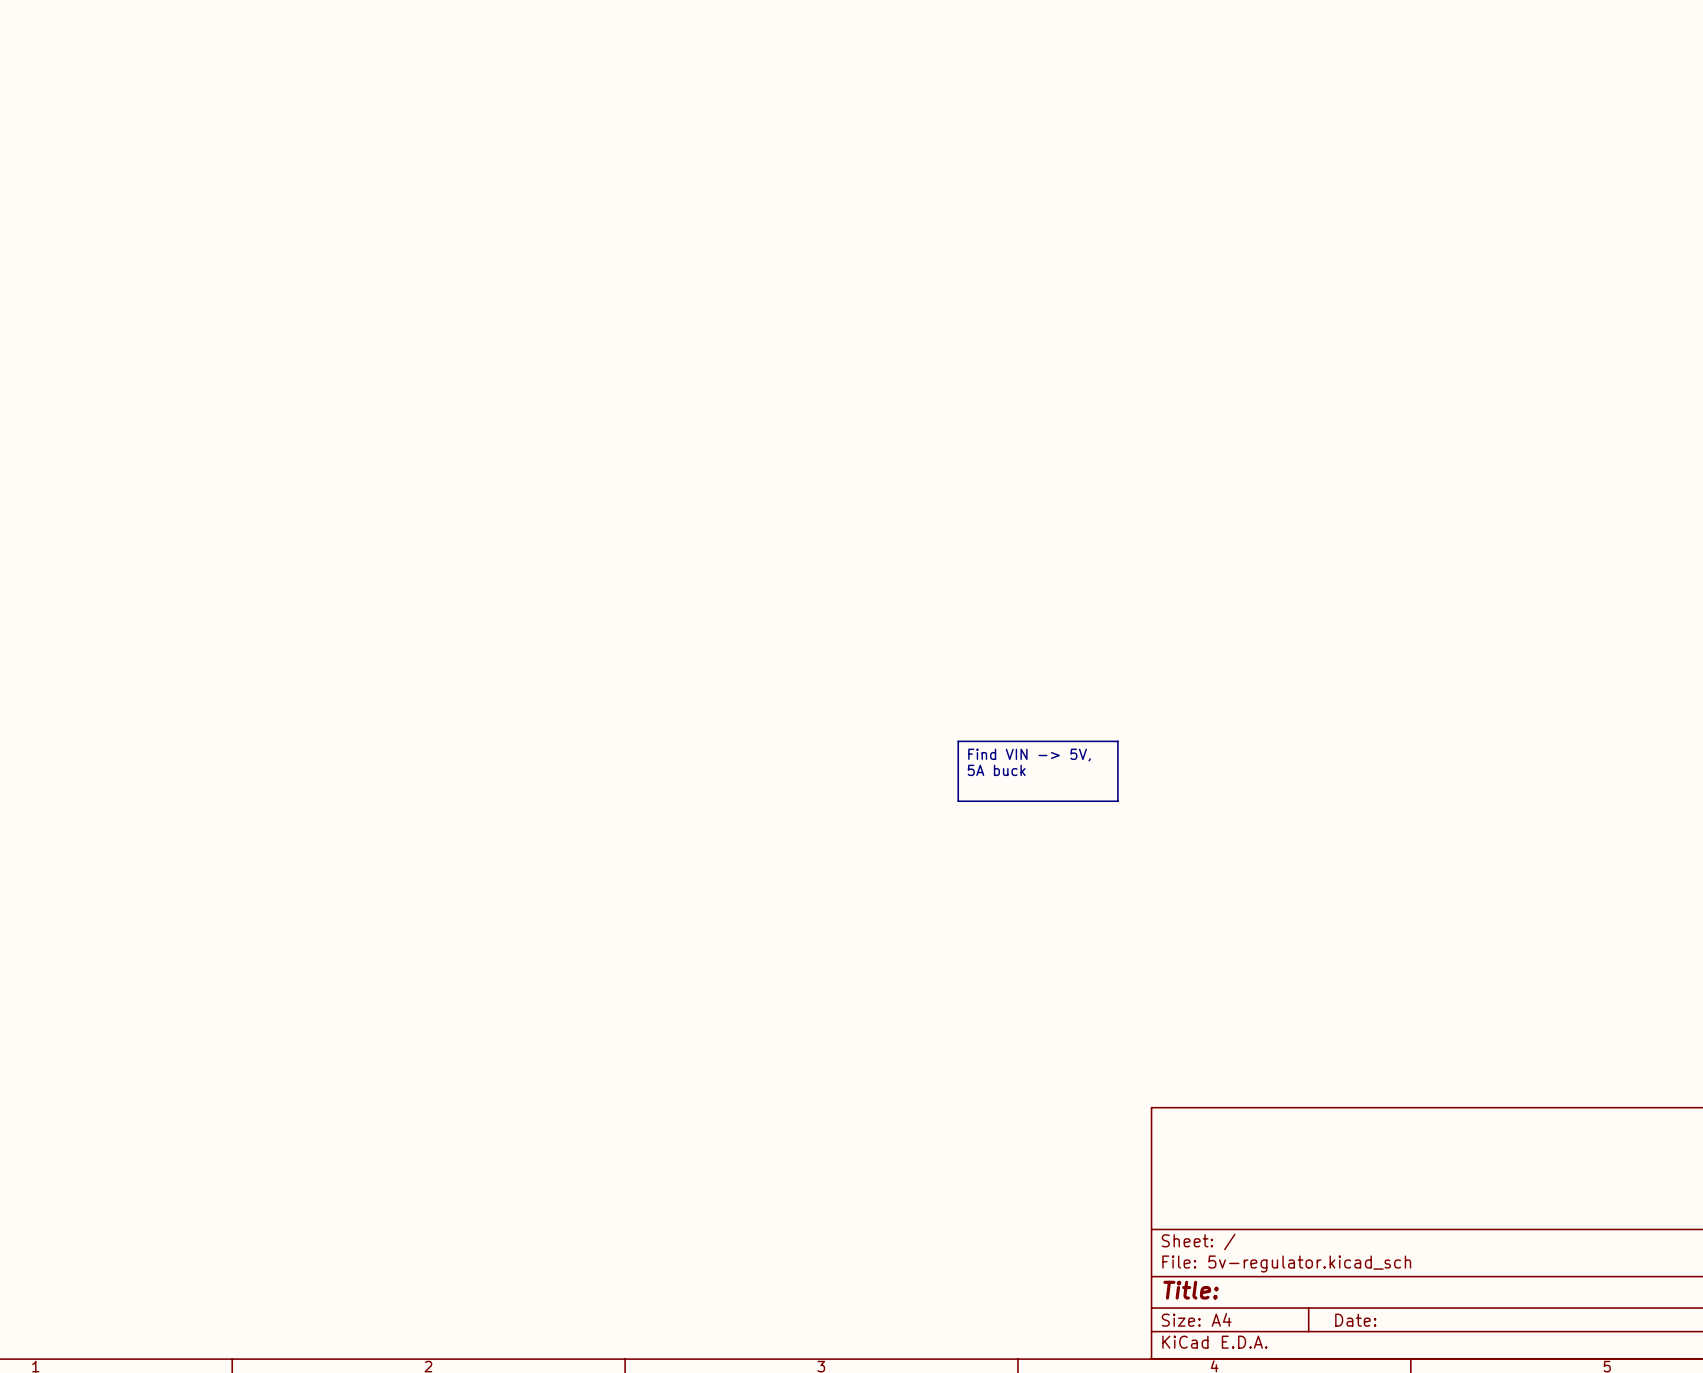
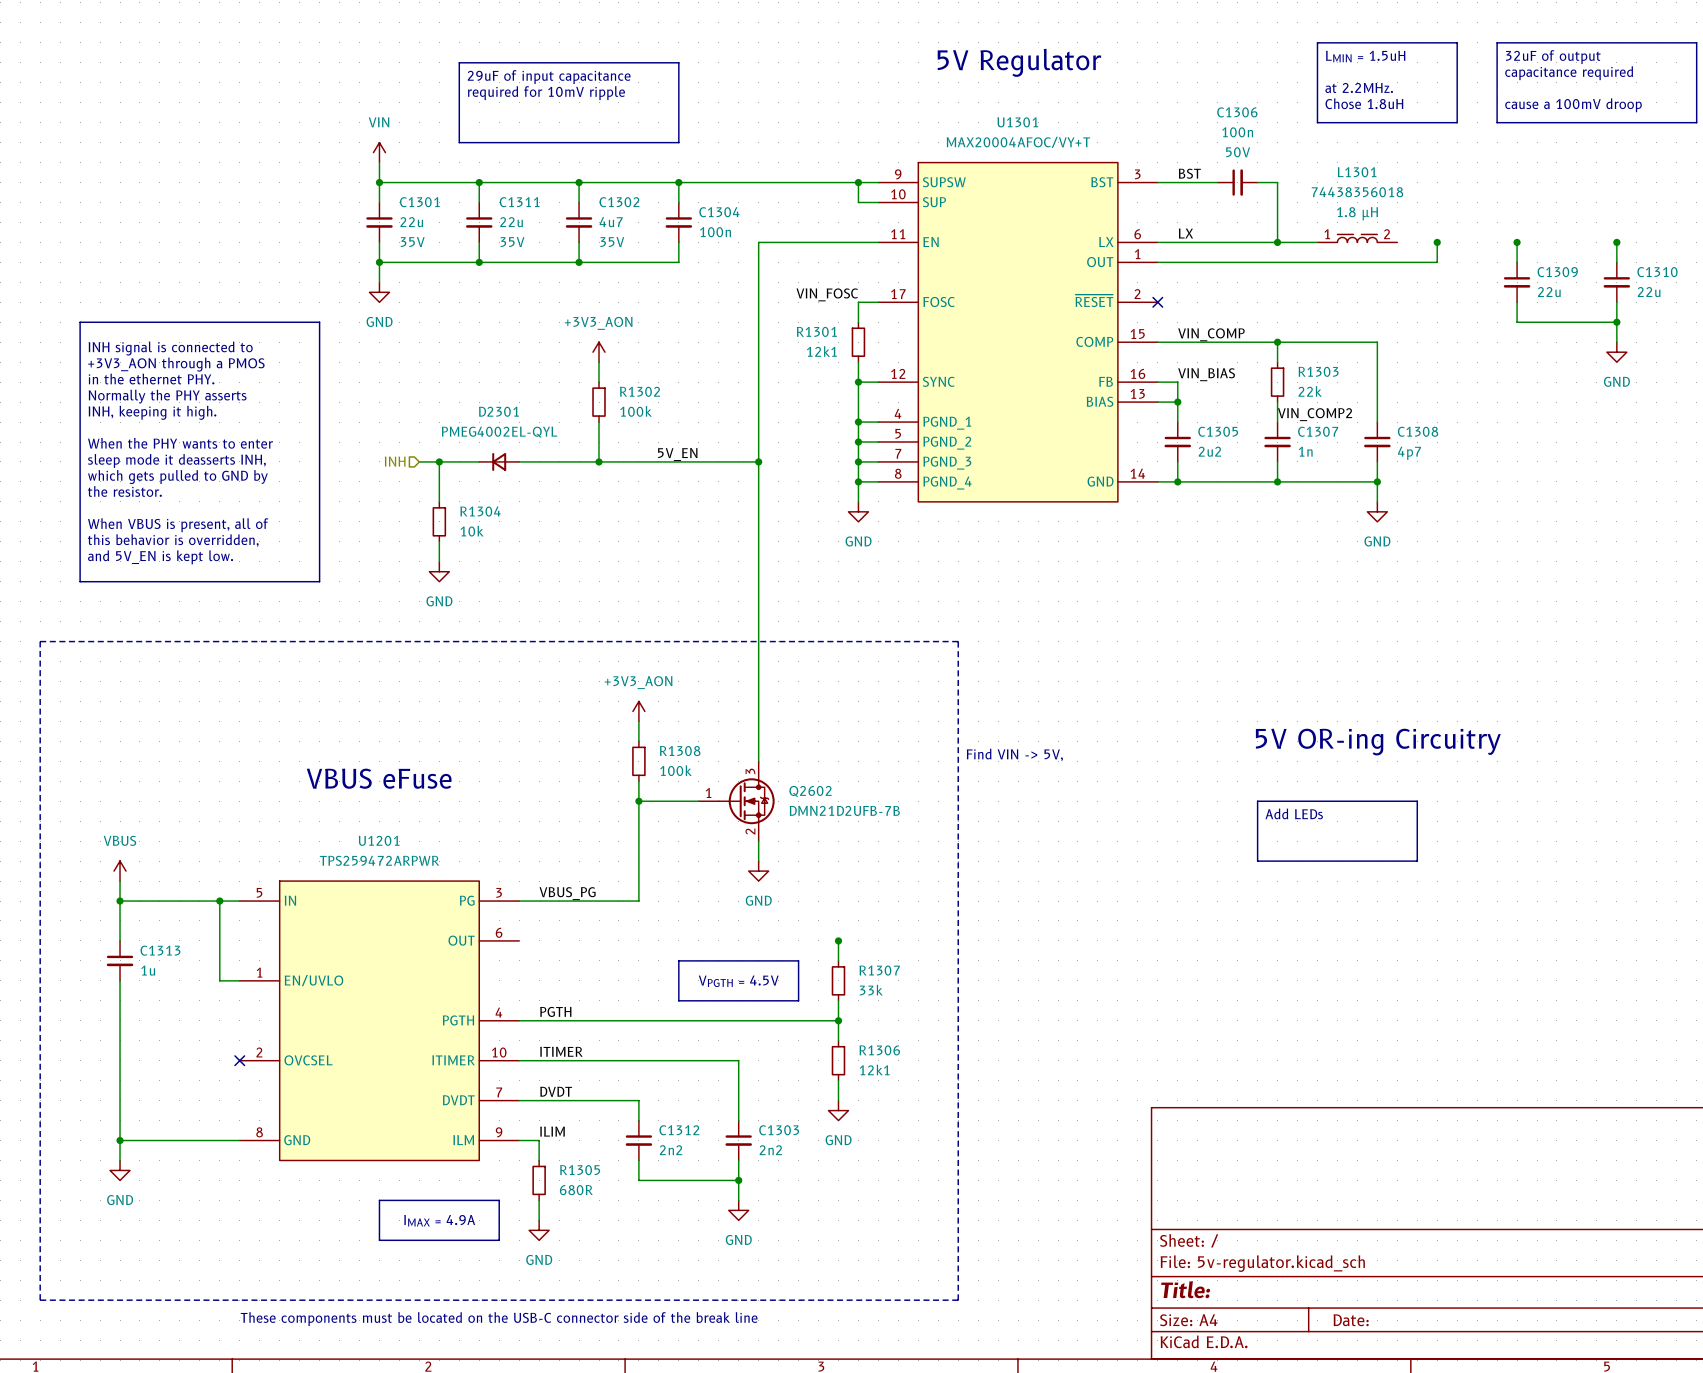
line: none -> (1317, 42) (1457, 42) (1457, 122) (1317, 122) (1317, 42)
line: none -> (1497, 42) (1696, 42) (1696, 122) (1497, 122) (1497, 42)
text: none -> LMIN = 1.5uH (1365, 56)
text: none -> 32uF of output (1553, 57)
line: none -> (459, 62) (678, 62) (678, 142) (459, 142) (459, 62)
text: none -> 5V Regulator (1019, 62)
text: none -> capacitance required (1569, 73)
text: none -> 29uF of input capacitance (549, 77)
text: none -> at 2.2MHz. (1359, 87)
text: none -> required for 10mV ripple (546, 93)
text: none -> Chose 1.8uH (1364, 103)
text: none -> cause a 100mV droop (1573, 105)
power symbol: none -> VIN (379, 152)
wire: none -> (379, 162) (379, 202)
label: none -> BST (1189, 173)
wire: none -> (379, 182) (878, 182)
junction: none -> (379, 182)
wire: none -> (479, 182) (479, 202)
junction: none -> (479, 182)
wire: none -> (579, 182) (579, 202)
junction: none -> (579, 182)
wire: none -> (678, 182) (678, 202)
junction: none -> (678, 182)
wire: none -> (858, 182) (858, 202) (878, 202)
junction: none -> (858, 182)
wire: none -> (1157, 182) (1217, 182)
C1306: none -> 100n (1237, 182)
wire: none -> (1257, 182) (1277, 182) (1277, 242)
C1301: none -> 22u (379, 222)
C1311: none -> 22u (479, 222)
C1302: none -> 4u7 (579, 222)
C1304: none -> 100n (678, 222)
label: none -> LX (1185, 233)
L1301: none -> 74438356018 (1357, 238)
wire: none -> (379, 242) (379, 282)
wire: none -> (479, 242) (479, 262)
wire: none -> (579, 242) (579, 262)
wire: none -> (678, 242) (678, 262) (379, 262)
wire: none -> (878, 242) (758, 242) (758, 761)
wire: none -> (1157, 242) (1317, 242)
junction: none -> (1277, 242)
wire: none -> (1437, 242) (1437, 262) (1157, 262)
junction: none -> (1437, 242)
wire: none -> (1517, 242) (1517, 262)
junction: none -> (1517, 242)
wire: none -> (1616, 242) (1616, 262)
junction: none -> (1616, 242)
junction: none -> (379, 262)
junction: none -> (479, 262)
junction: none -> (579, 262)
C1309: none -> 22u (1517, 282)
C1310: none -> 22u (1616, 282)
power symbol: none -> GND (379, 292)
label: none -> VIN_FOSC (827, 294)
wire: none -> (878, 302) (858, 302) (858, 322)
no-connect mark: none -> (1157, 302)
wire: none -> (1517, 302) (1517, 322) (1616, 322)
wire: none -> (1616, 302) (1616, 342)
line: none -> (80, 322) (319, 322) (319, 581) (80, 581) (80, 322)
junction: none -> (1616, 322)
U1301: none -> MAX20004AFOC/VY+T (1018, 332)
label: none -> VIN_COMP (1211, 334)
R1301: none -> 12k1 (858, 342)
wire: none -> (1157, 342) (1377, 342) (1377, 422)
wire: none -> (1277, 342) (1277, 362)
junction: none -> (1277, 342)
text: none -> INH signal is connected to (170, 348)
power symbol: none -> +3V3_AON (599, 352)
power symbol: none -> GND (1616, 352)
wire: none -> (599, 362) (599, 382)
wire: none -> (858, 362) (858, 501)
text: none -> +3V3_AON through a PMOS (176, 364)
label: none -> VIN_BIAS (1206, 374)
text: none -> in the ethernet PHY. (151, 379)
wire: none -> (858, 382) (878, 382)
junction: none -> (858, 382)
wire: none -> (1157, 382) (1177, 382) (1177, 422)
R1303: none -> 22k (1277, 382)
text: none -> Normally the PHY asserts (167, 396)
R1302: none -> 100k (599, 402)
wire: none -> (1157, 402) (1177, 402)
junction: none -> (1177, 402)
wire: none -> (1277, 402) (1277, 422)
text: none -> INH, keeping it high. (152, 412)
label: none -> VIN_COMP2 (1315, 414)
wire: none -> (599, 422) (599, 461)
wire: none -> (858, 422) (878, 422)
junction: none -> (858, 422)
wire: none -> (858, 442) (878, 442)
junction: none -> (858, 442)
C1305: none -> 2u2 (1177, 442)
C1307: none -> 1n (1277, 442)
C1308: none -> 4p7 (1377, 442)
text: none -> When the PHY wants to enter (180, 443)
label: none -> 5V_EN (677, 454)
text: none -> sleep mode it deasserts INH, (176, 460)
hierarchical label: none -> INH (395, 461)
wire: none -> (419, 461) (479, 461)
wire: none -> (439, 461) (439, 501)
junction: none -> (439, 461)
D2301: none -> PMEG4002EL-QYL (499, 461)
wire: none -> (519, 461) (758, 461)
junction: none -> (599, 461)
junction: none -> (758, 461)
wire: none -> (858, 461) (878, 461)
junction: none -> (858, 461)
wire: none -> (1177, 461) (1177, 481)
wire: none -> (1277, 461) (1277, 481)
wire: none -> (1377, 461) (1377, 501)
text: none -> which gets pulled to GND by (177, 477)
wire: none -> (858, 481) (878, 481)
junction: none -> (858, 481)
wire: none -> (1157, 481) (1377, 481)
junction: none -> (1177, 481)
junction: none -> (1277, 481)
junction: none -> (1377, 481)
text: none -> the resistor. (124, 491)
power symbol: none -> GND (858, 511)
power symbol: none -> GND (1377, 511)
R1304: none -> 10k (439, 521)
text: none -> When VBUS is present, all of (178, 525)
text: none -> this behavior is overridden, (173, 540)
wire: none -> (439, 541) (439, 561)
text: none -> and 5V_EN is kept low. (160, 557)
power symbol: none -> GND (439, 571)
line: none -> (40, 641) (958, 641) (958, 1300) (40, 1300) (40, 641)
power symbol: none -> +3V3_AON (638, 711)
wire: none -> (638, 721) (638, 741)
line: (958, 741) (1117, 741) (1117, 801) (958, 801) (958, 741) -> none
text: none -> 5V OR-ing Circuitry (1378, 742)
R1308: none -> 100k (638, 761)
text: 5A buck (996, 770) -> none
text: none -> VBUS eFuse (379, 778)
wire: none -> (638, 781) (638, 901) (519, 901)
wire: none -> (638, 801) (698, 801)
junction: none -> (638, 801)
Q2602: none -> DMN21D2UFB-7B (736, 801)
line: none -> (1257, 801) (1417, 801) (1417, 861) (1257, 861) (1257, 801)
text: none -> Add LEDs (1294, 813)
wire: none -> (758, 841) (758, 861)
power symbol: none -> VBUS (120, 871)
power symbol: none -> GND (758, 871)
wire: none -> (120, 881) (120, 940)
label: none -> VBUS_PG (567, 893)
wire: none -> (120, 901) (239, 901)
junction: none -> (120, 901)
wire: none -> (219, 901) (219, 980) (239, 980)
junction: none -> (219, 901)
wire: none -> (838, 940) (838, 960)
junction: none -> (838, 940)
C1313: none -> 1u (120, 960)
line: none -> (678, 960) (798, 960) (798, 1000) (678, 1000) (678, 960)
wire: none -> (120, 980) (120, 1160)
R1307: none -> 33k (838, 980)
text: none -> VPGTH = 4.5V (738, 981)
wire: none -> (838, 1000) (838, 1040)
label: none -> PGTH (555, 1011)
U1201: none -> TPS259472ARPWR (379, 1020)
wire: none -> (519, 1020) (838, 1020)
junction: none -> (838, 1020)
label: none -> ITIMER (561, 1051)
no-connect mark: none -> (239, 1060)
wire: none -> (519, 1060) (738, 1060) (738, 1120)
R1306: none -> 12k1 (838, 1060)
wire: none -> (838, 1080) (838, 1100)
label: none -> DVDT (556, 1091)
wire: none -> (519, 1100) (638, 1100) (638, 1120)
power symbol: none -> GND (838, 1110)
label: none -> ILIM (552, 1131)
wire: none -> (120, 1140) (239, 1140)
junction: none -> (120, 1140)
wire: none -> (519, 1140) (539, 1140) (539, 1160)
C1312: none -> 2n2 (638, 1140)
C1303: none -> 2n2 (738, 1140)
wire: none -> (638, 1160) (638, 1180) (738, 1180)
wire: none -> (738, 1160) (738, 1200)
power symbol: none -> GND (120, 1170)
R1305: none -> 680R (539, 1180)
junction: none -> (738, 1180)
line: none -> (379, 1200) (499, 1200) (499, 1240) (379, 1240) (379, 1200)
wire: none -> (539, 1200) (539, 1220)
power symbol: none -> GND (738, 1210)
text: none -> IMAX = 4.9A (439, 1220)
power symbol: none -> GND (539, 1230)
text: none -> These components must be located on the USB-C connector side of the break line (499, 1319)

